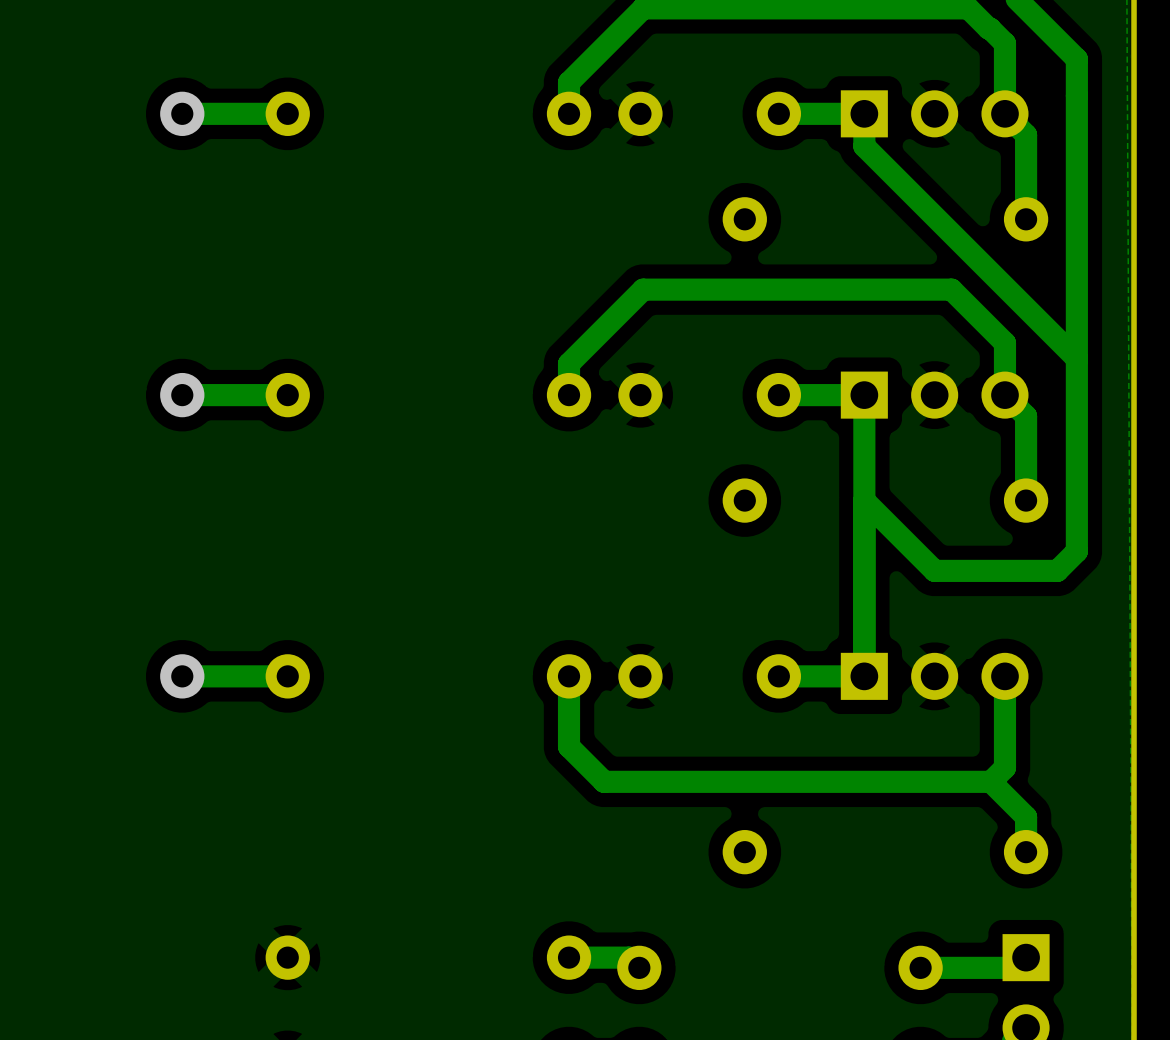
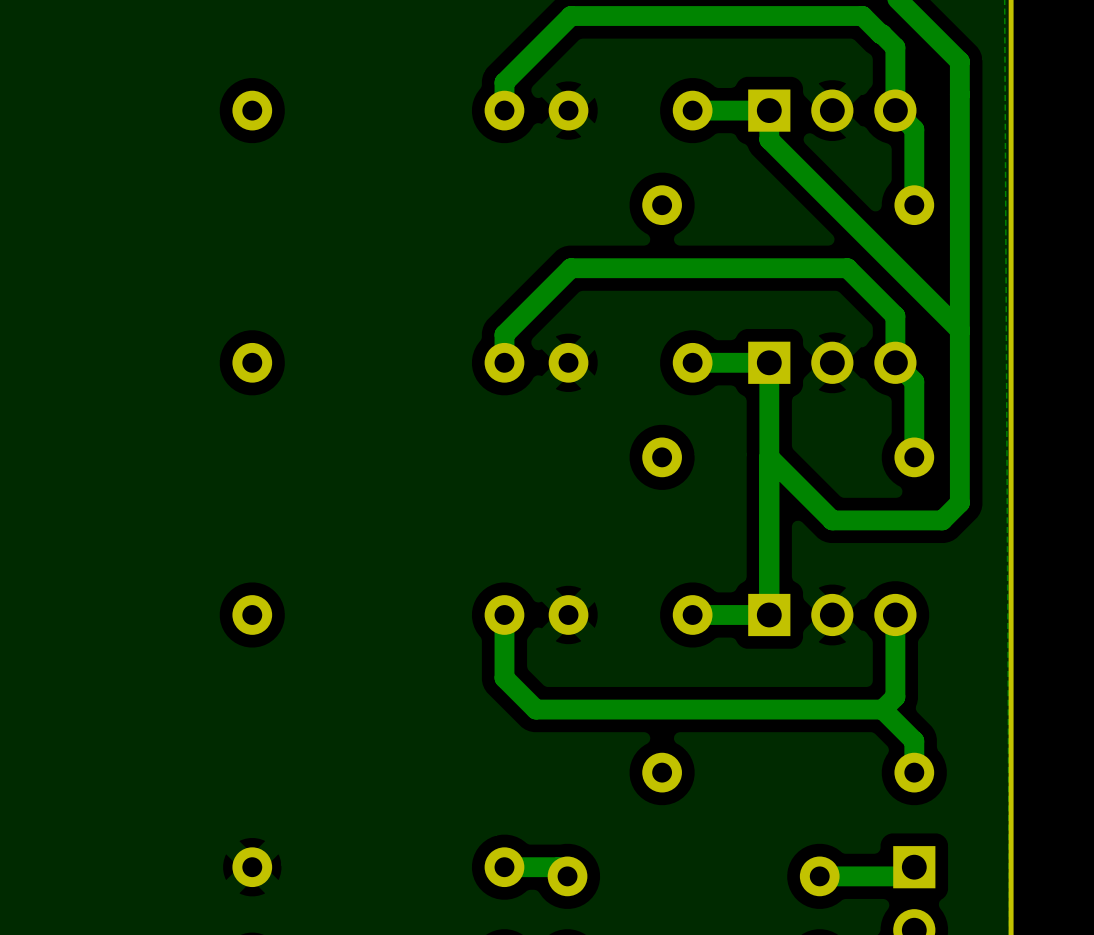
via: (182, 113) -> none
track: (287, 113) (182, 113) -> none
via: (182, 395) -> none
track: (287, 395) (182, 395) -> none
via: (182, 676) -> none
track: (287, 676) (182, 676) -> none

